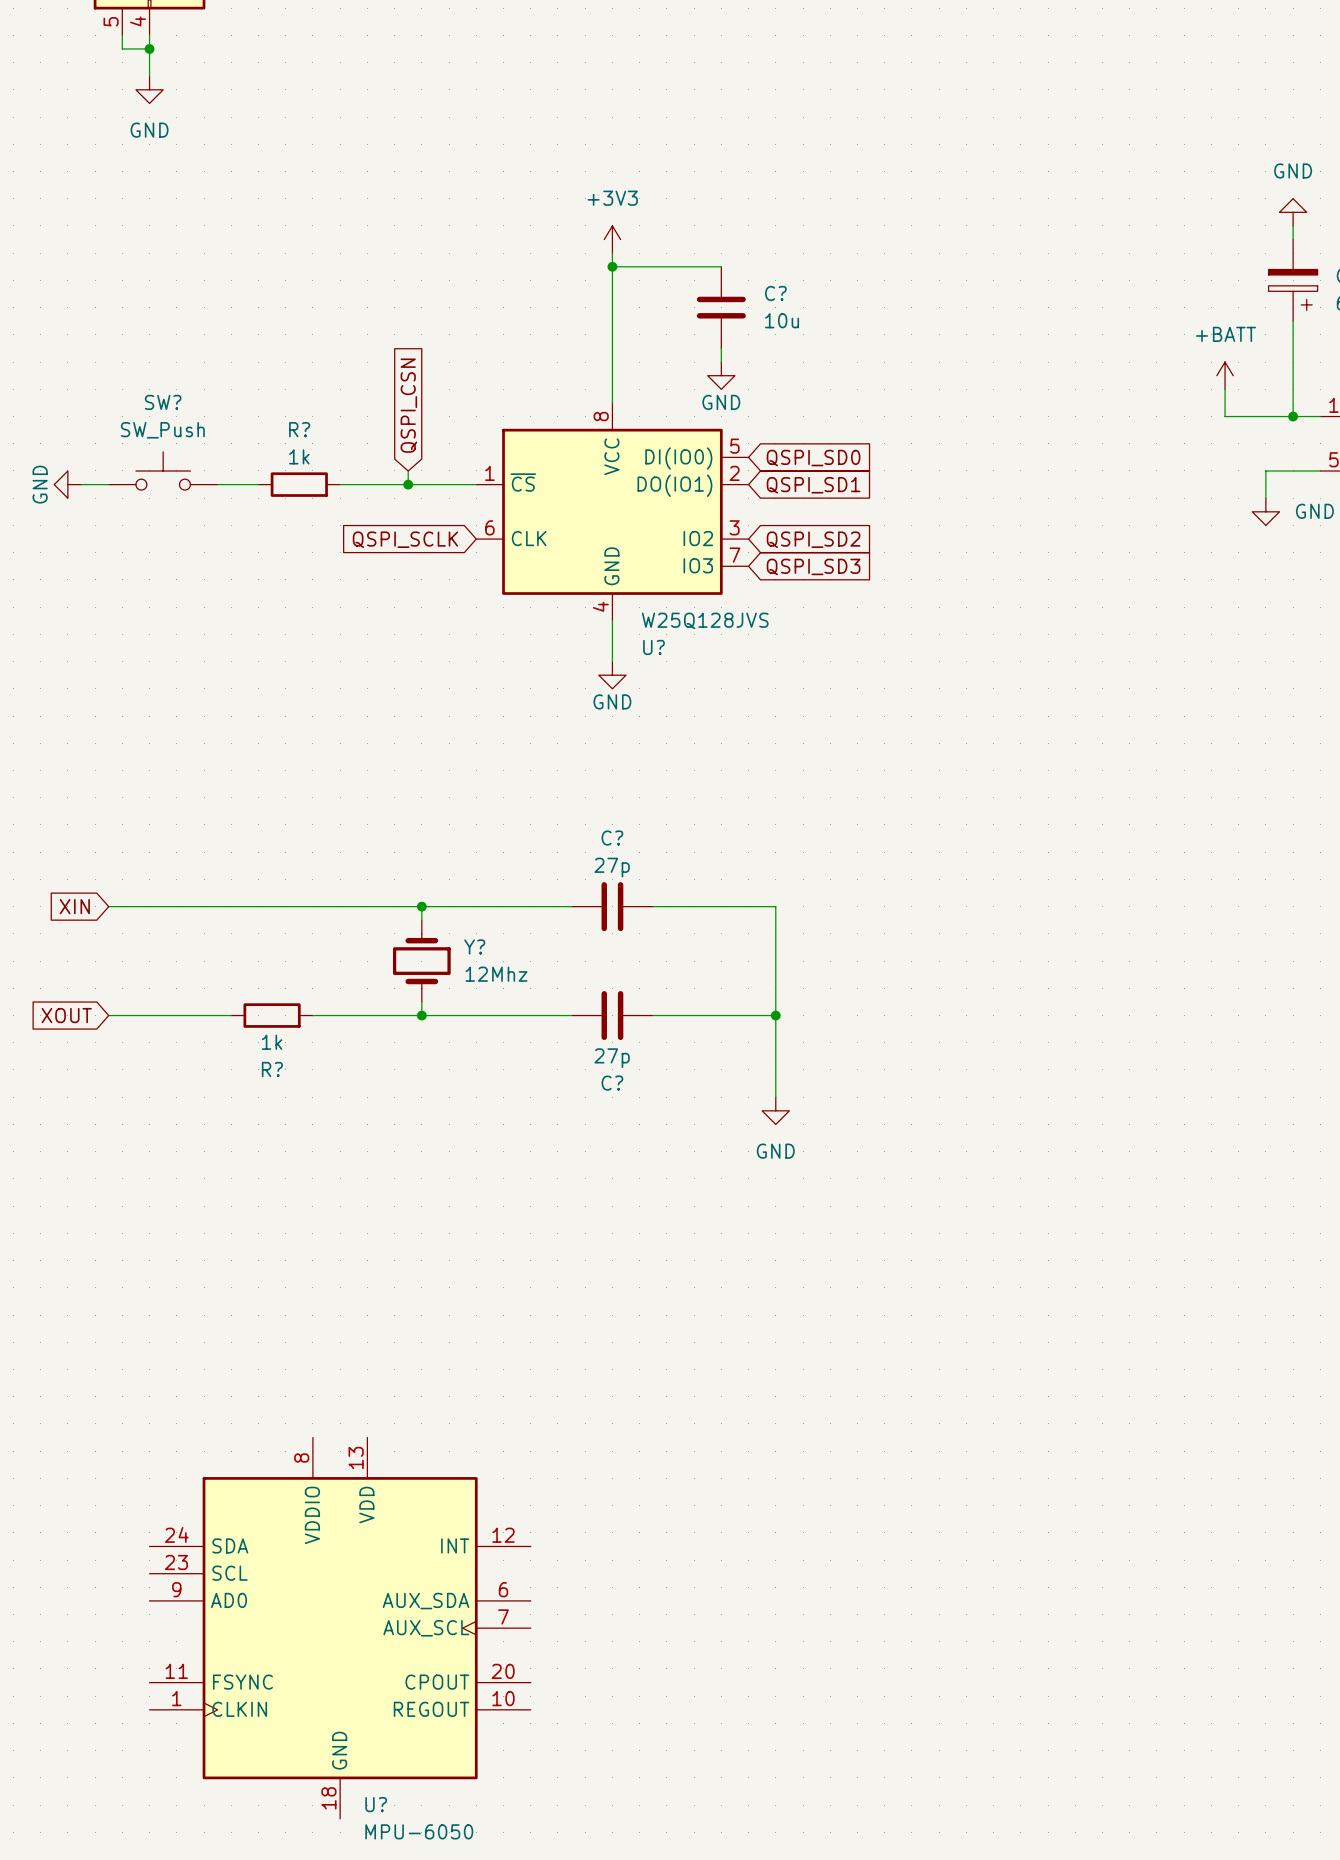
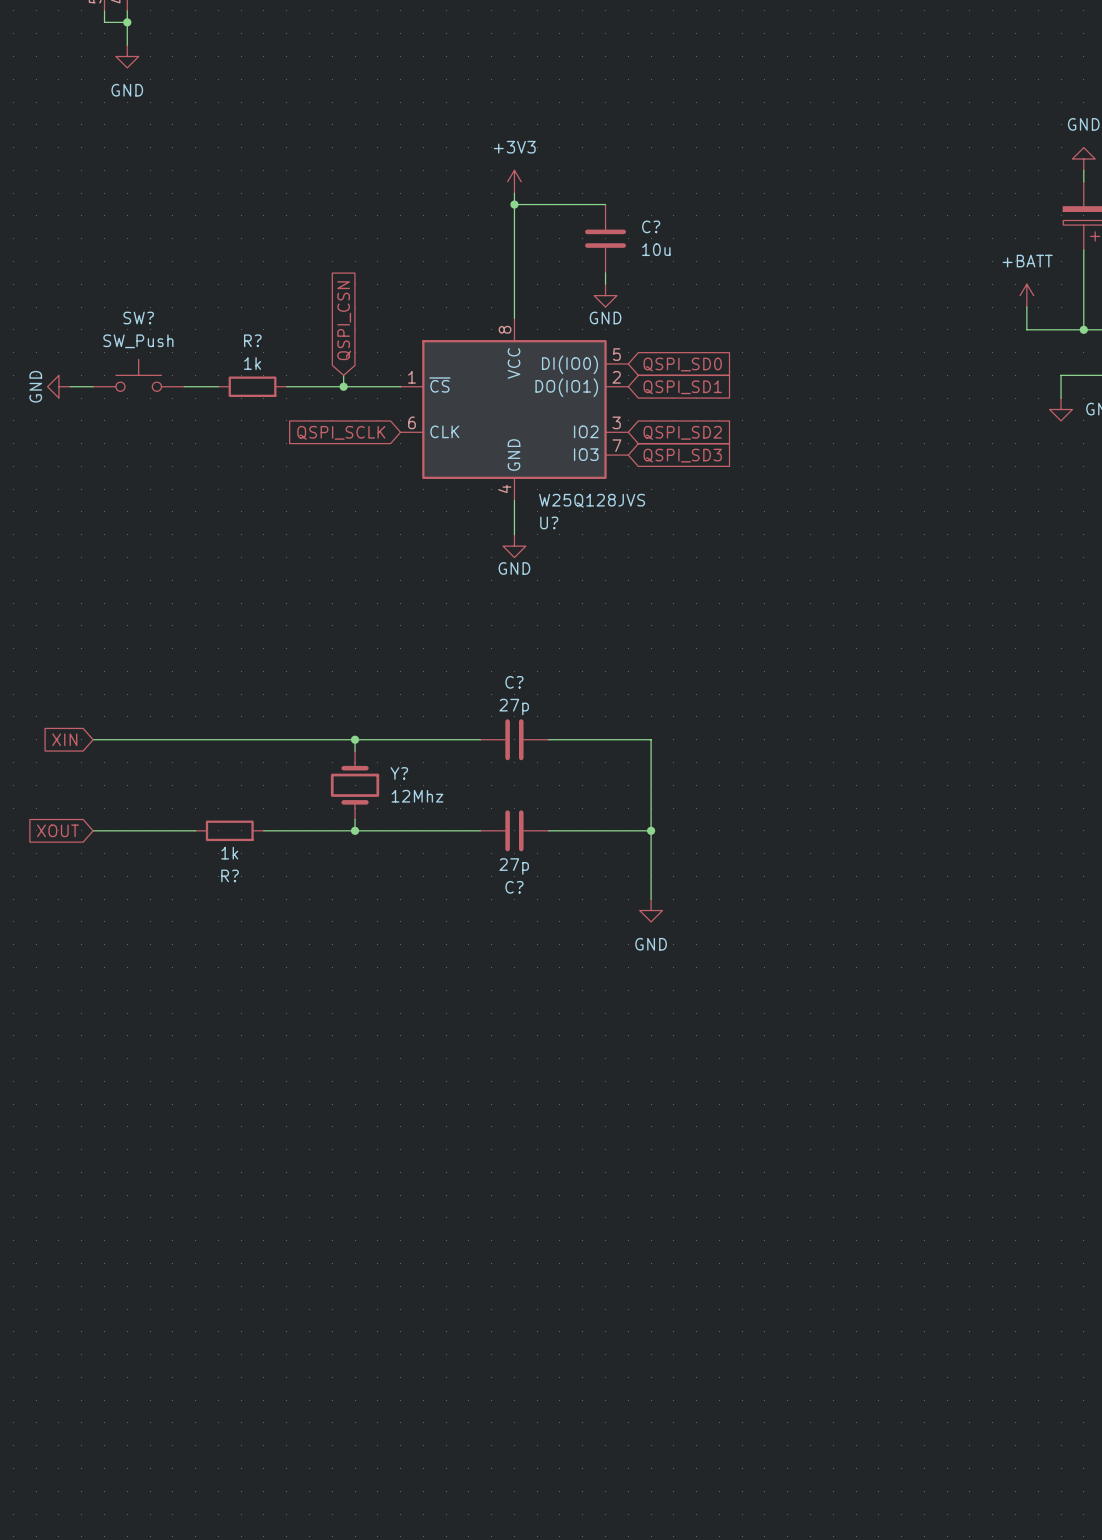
U?: MPU-6050 (340, 1628) -> none

